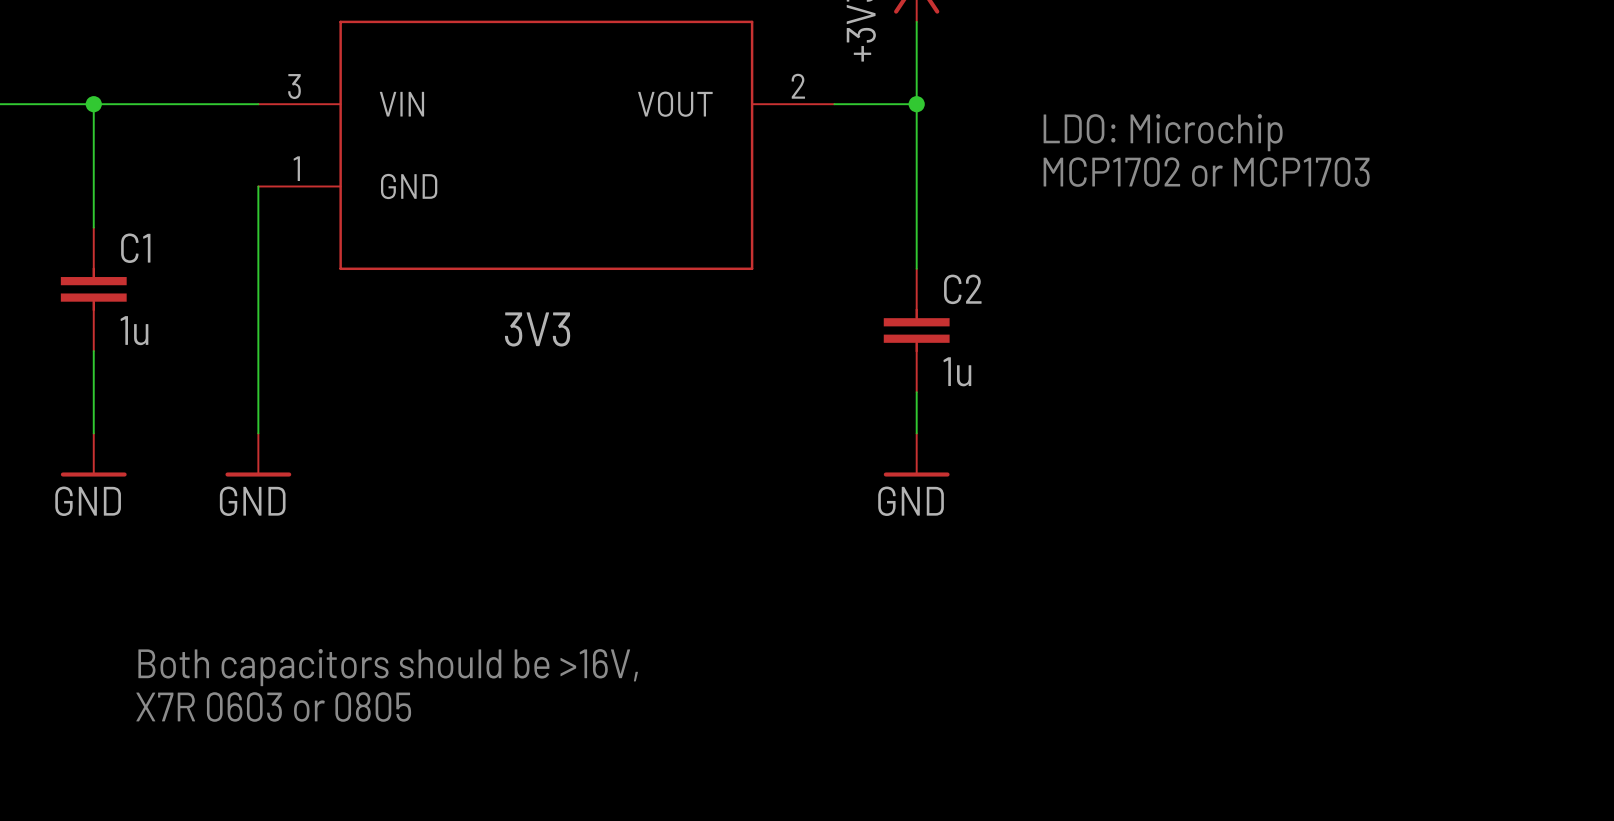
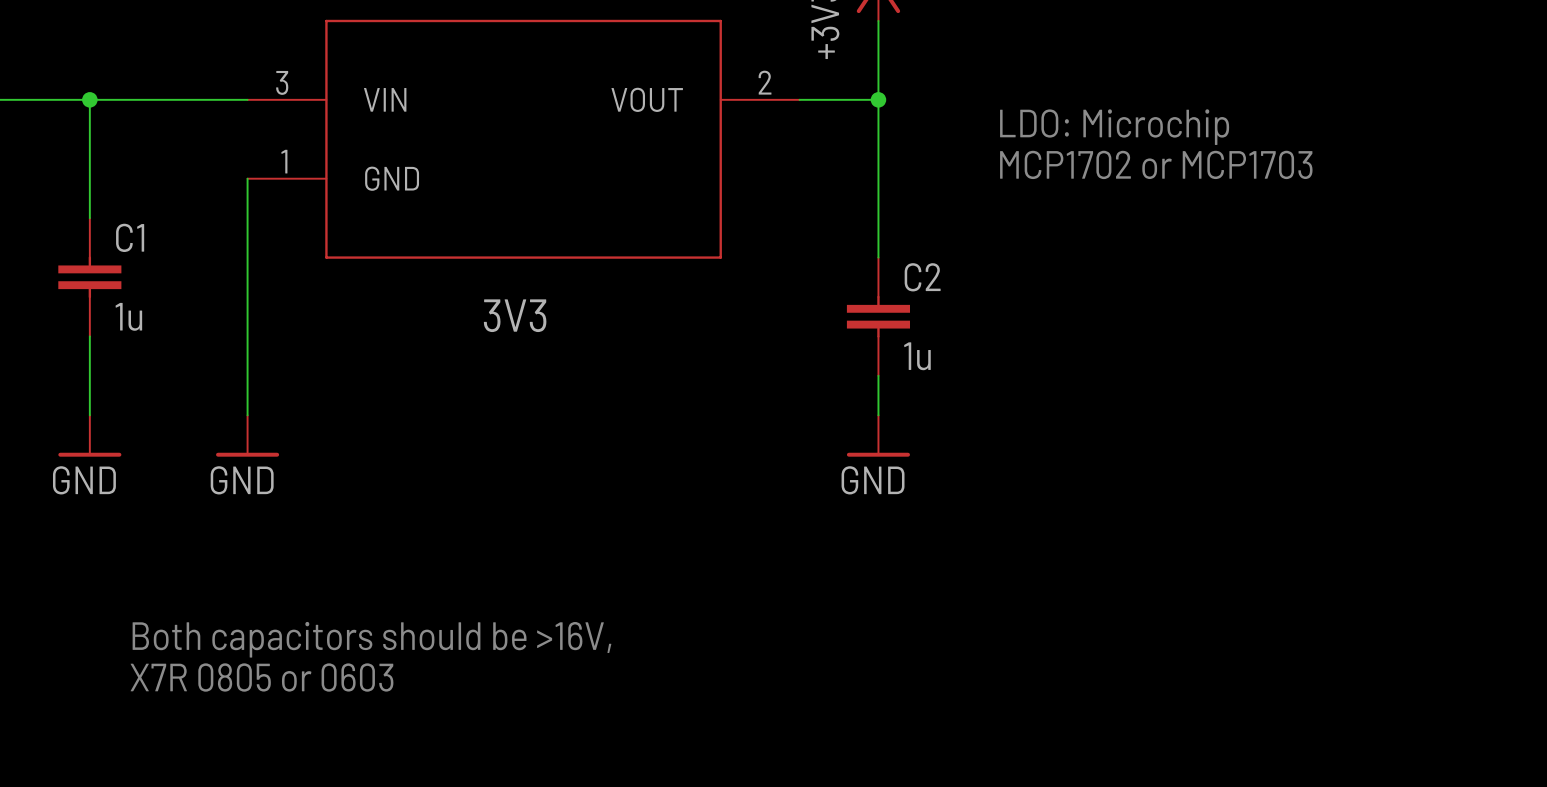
text: X7R 0603 or 0805 (273, 706) -> X7R 0805 or 0603 (262, 677)

